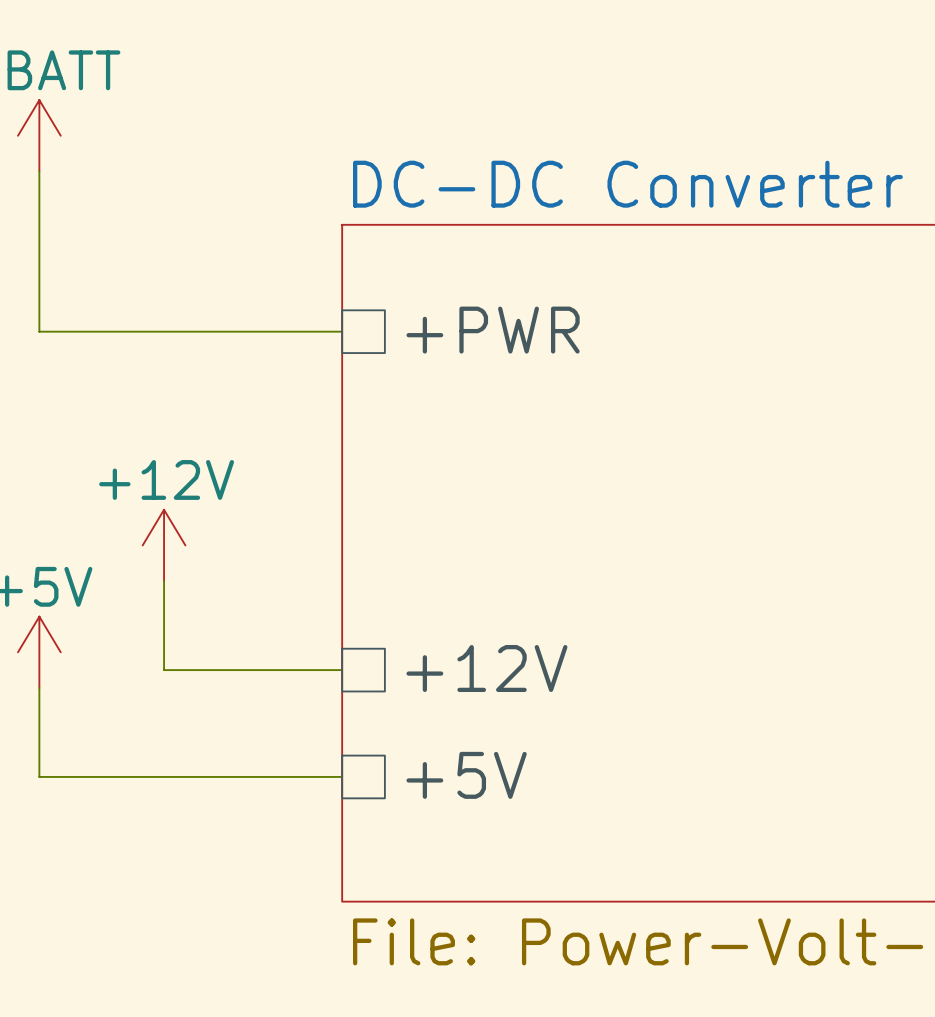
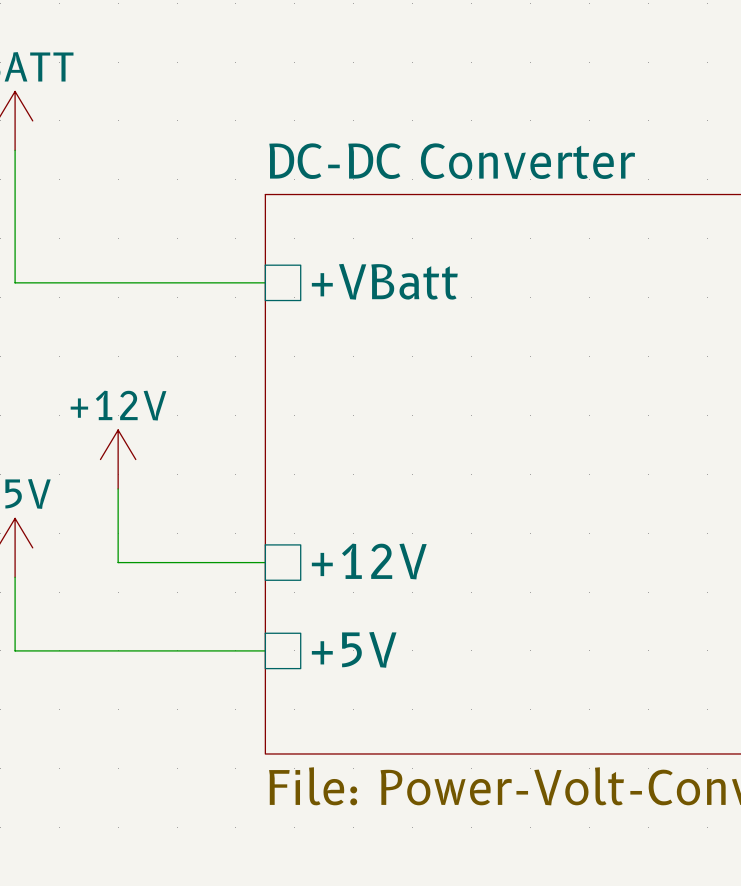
sheet pin: +PWR (493, 330) -> +VBatt (384, 281)

